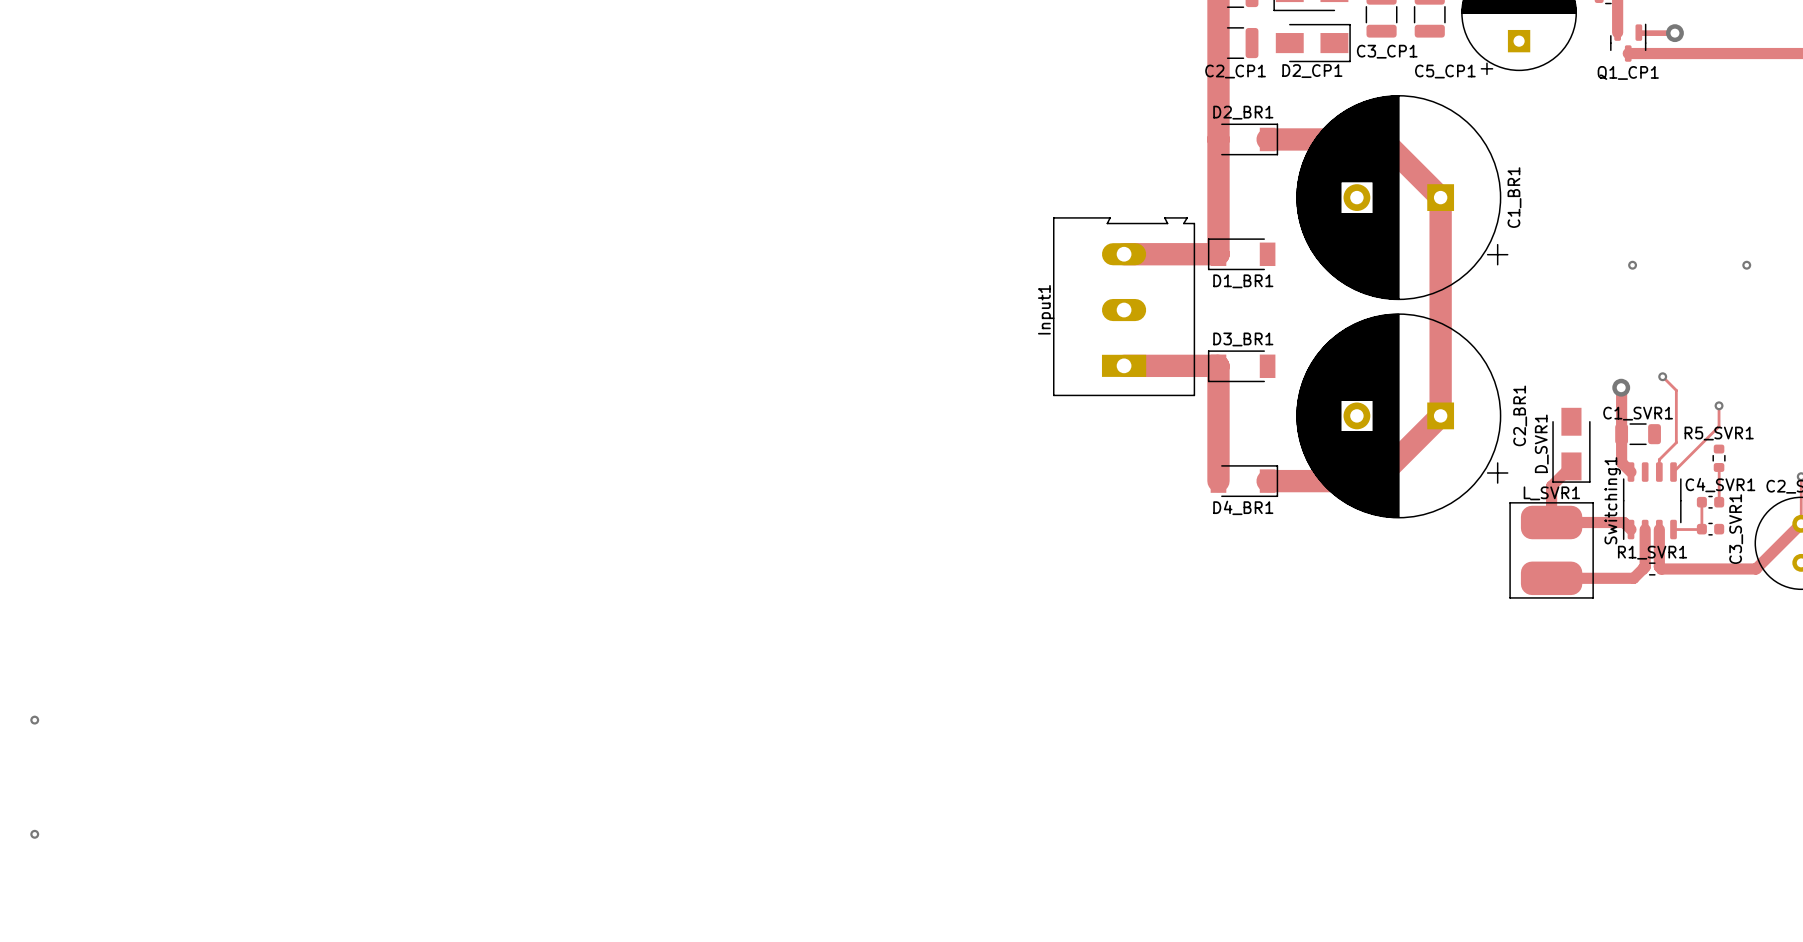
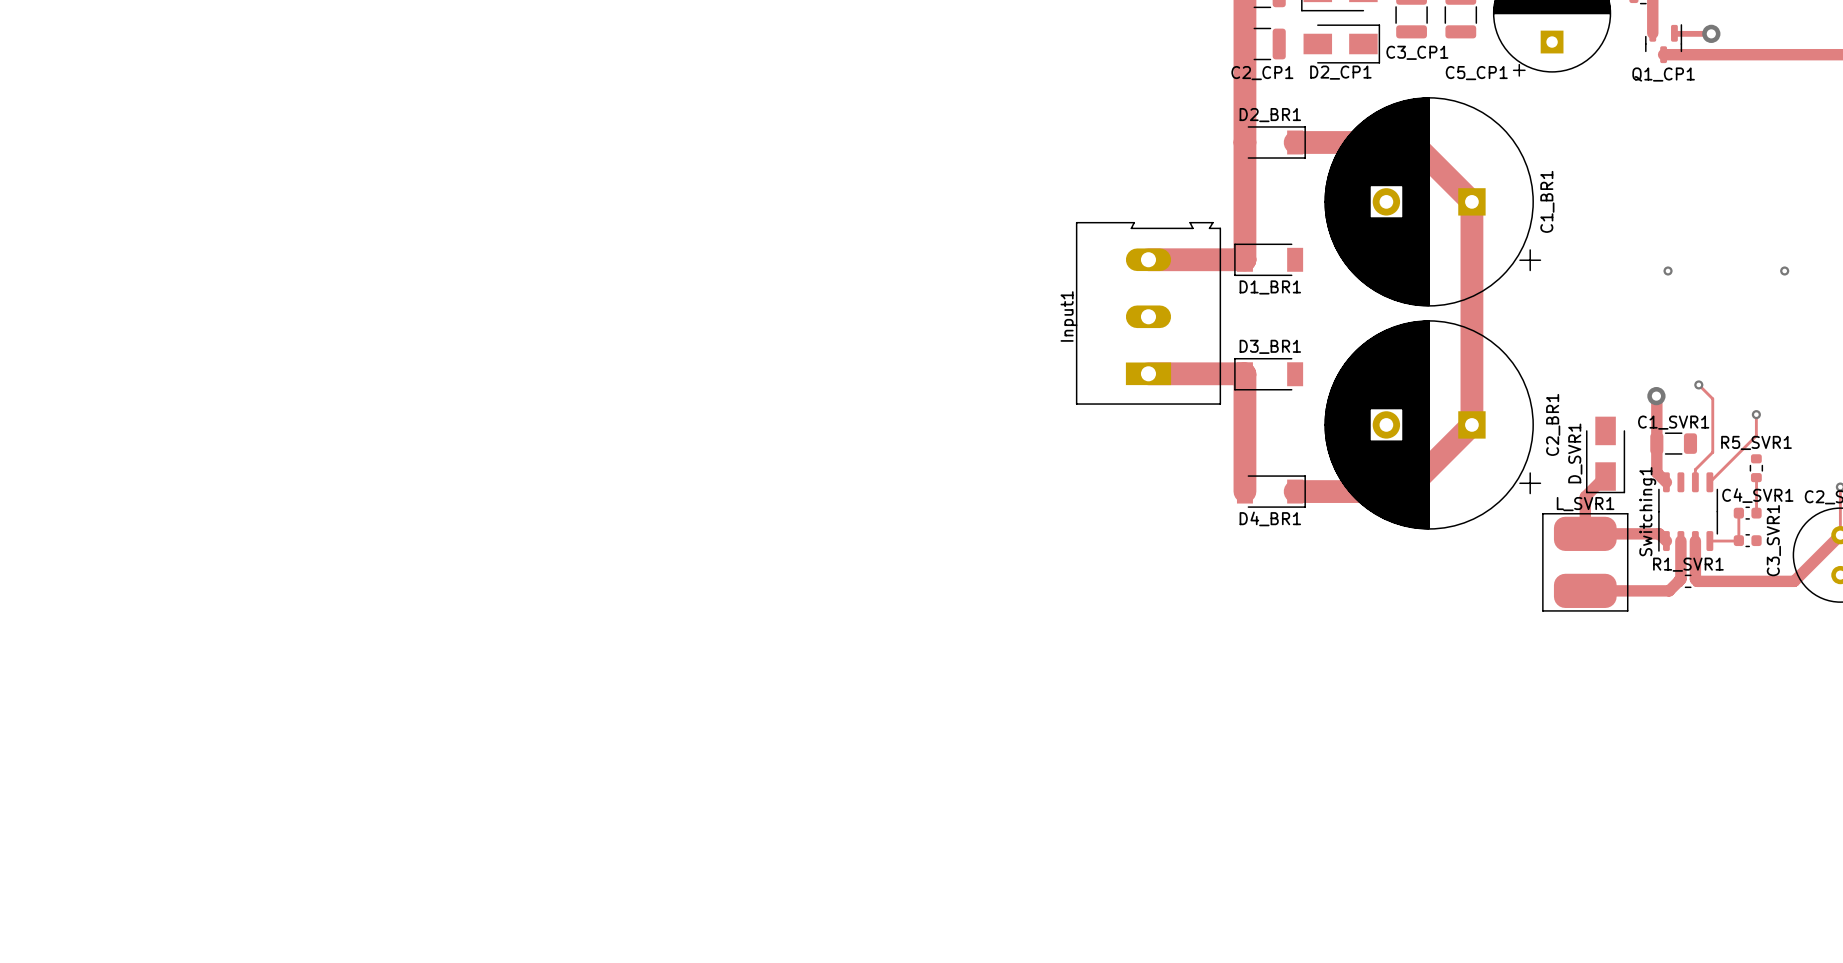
via: (34, 720) -> none
via: (34, 834) -> none

